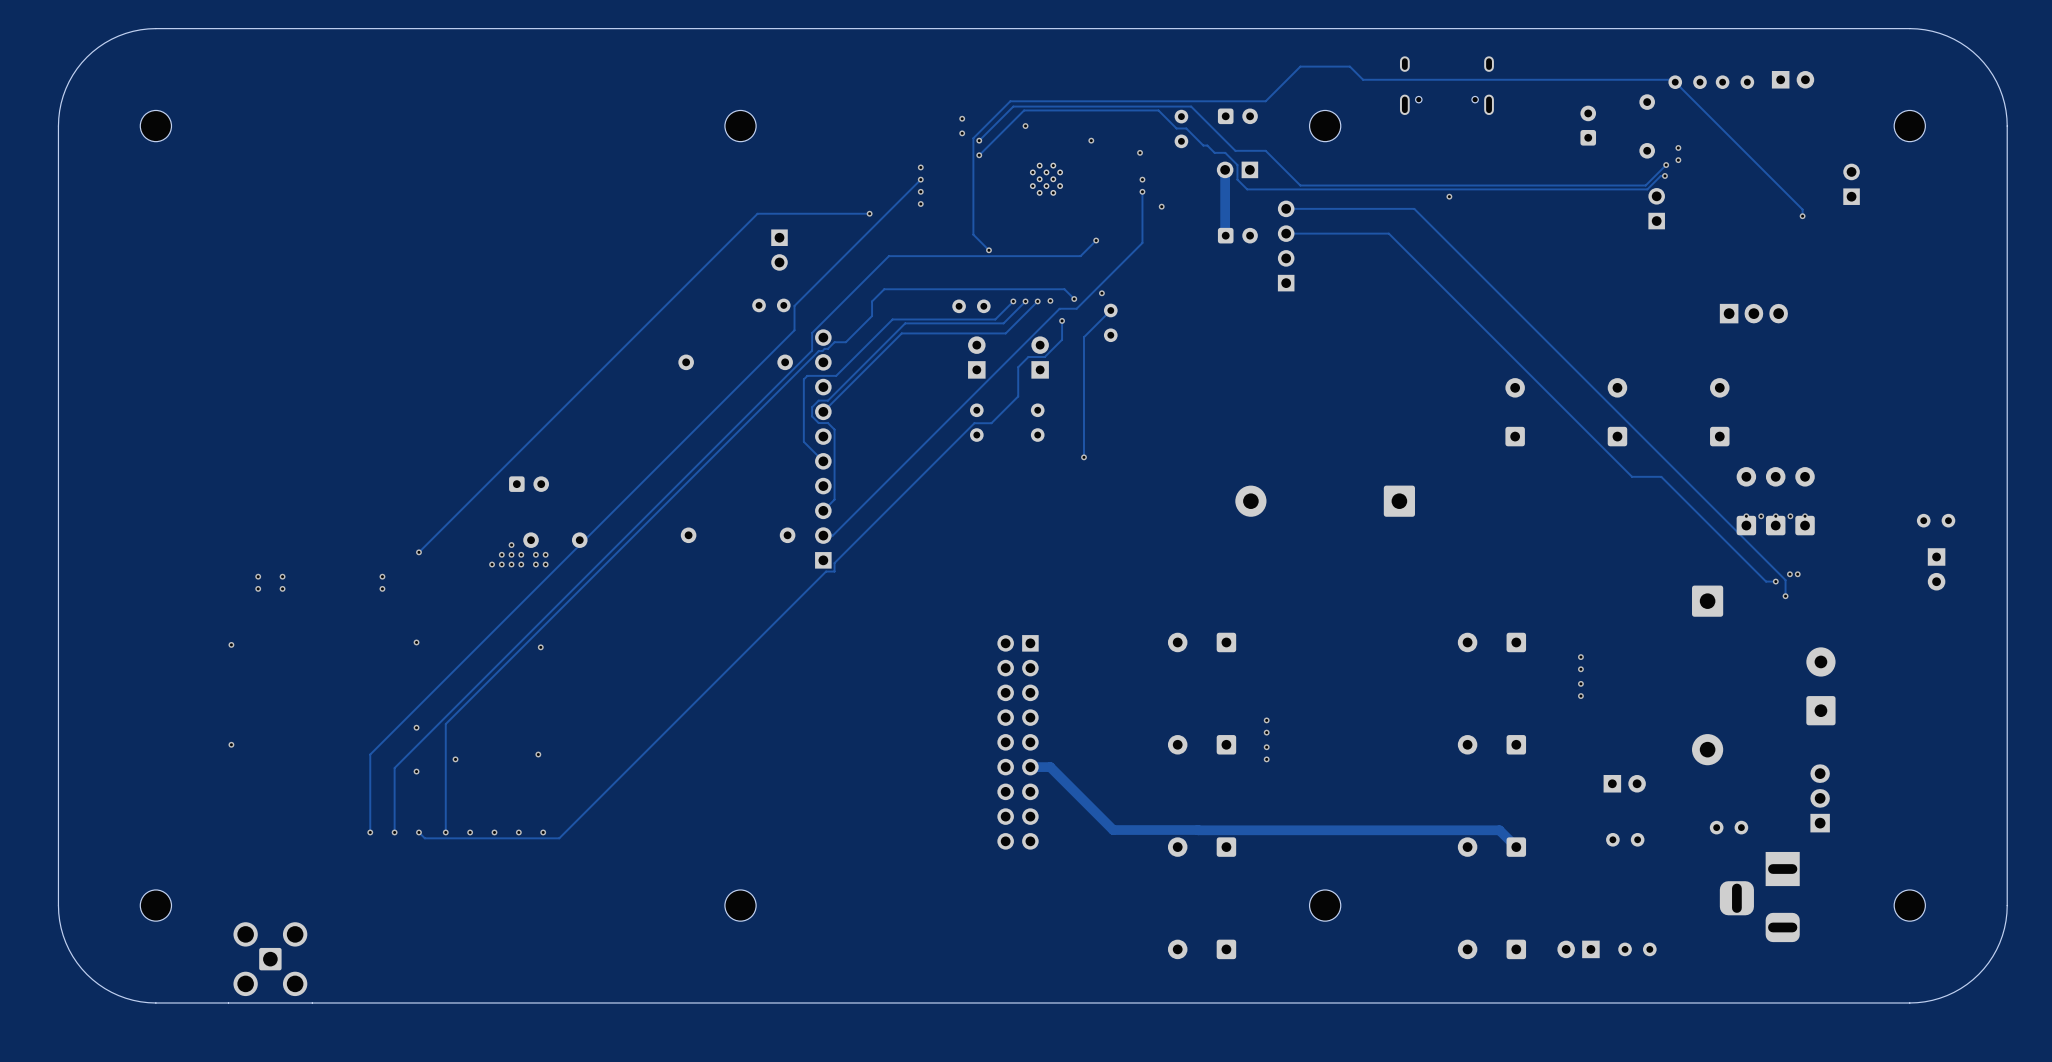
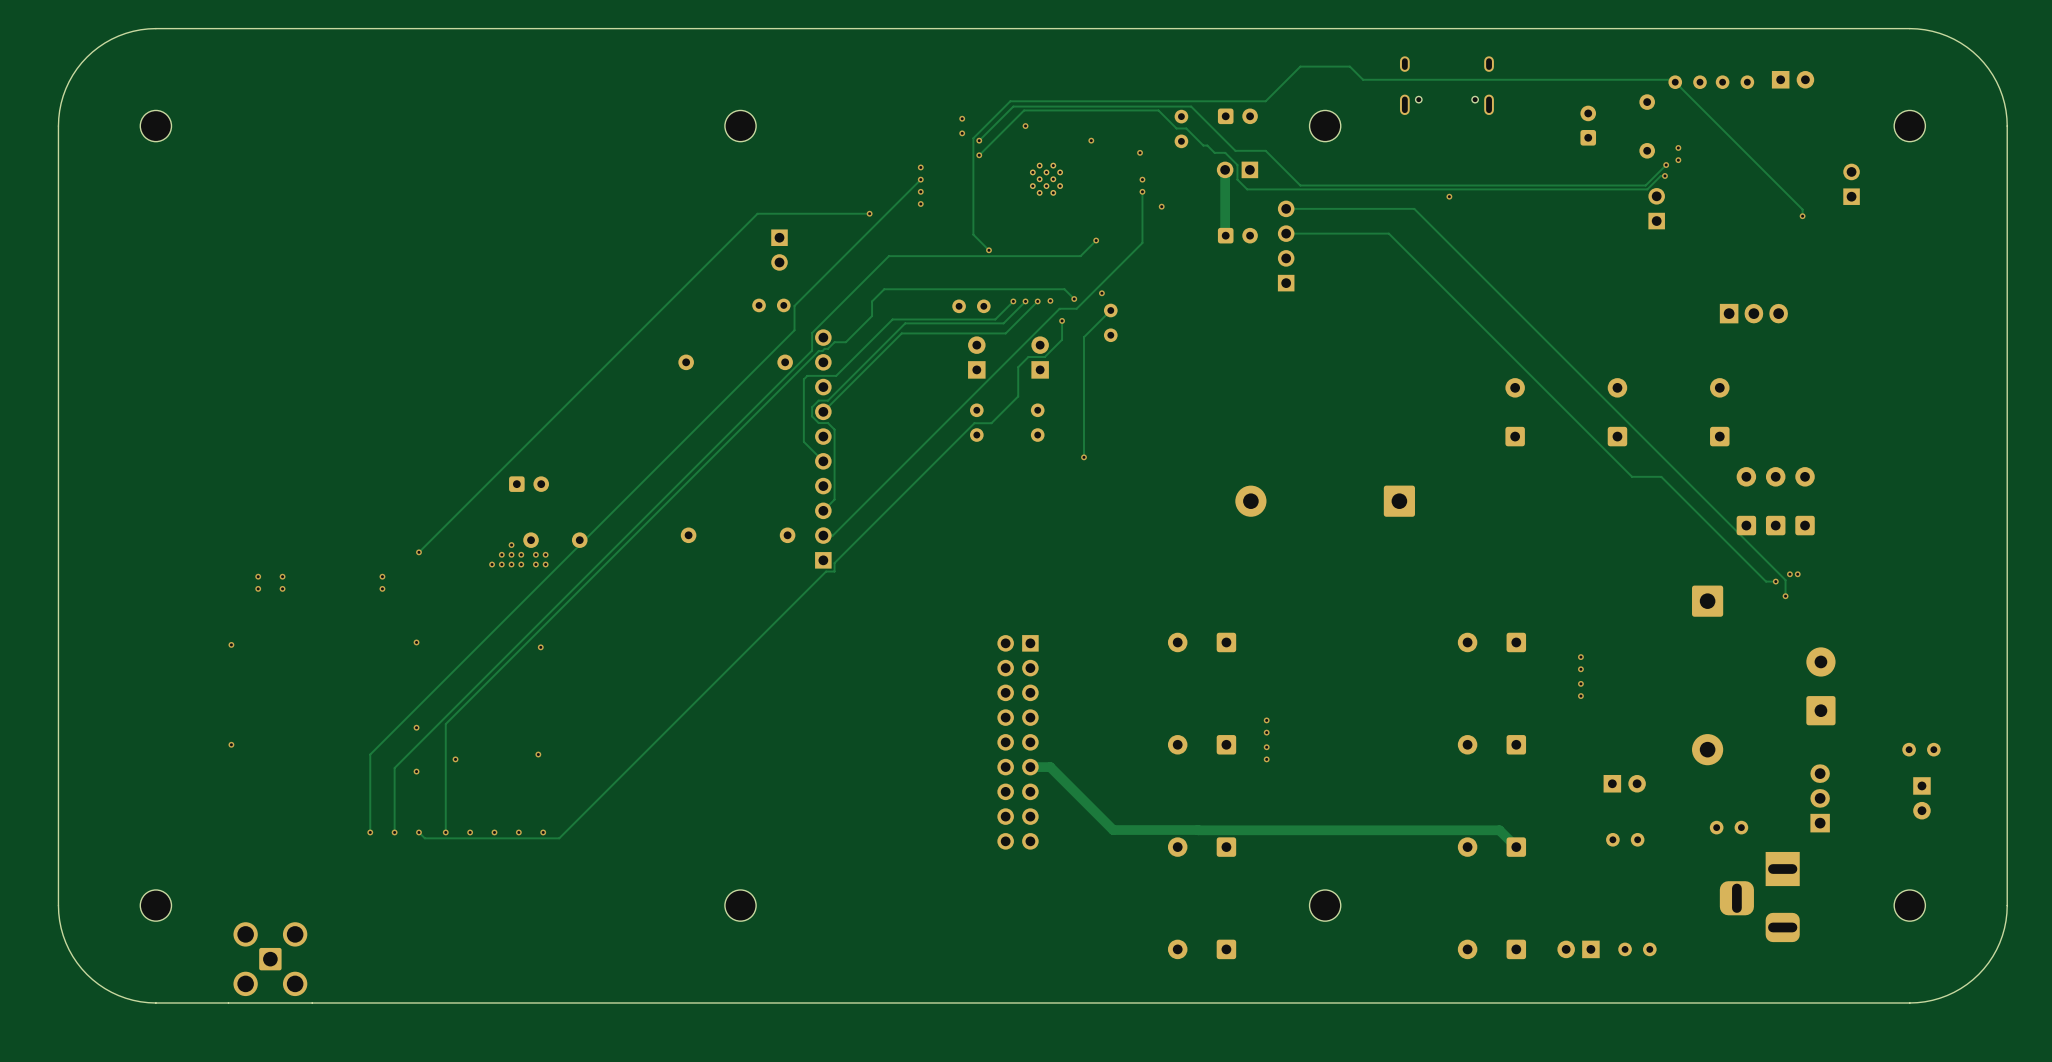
via: (1746, 516) -> none
via: (1761, 516) -> none
via: (1775, 516) -> none
via: (1790, 516) -> none
via: (1805, 516) -> none
part position: (1936, 520) -> (1921, 749)
part position: (1936, 569) -> (1921, 798)

